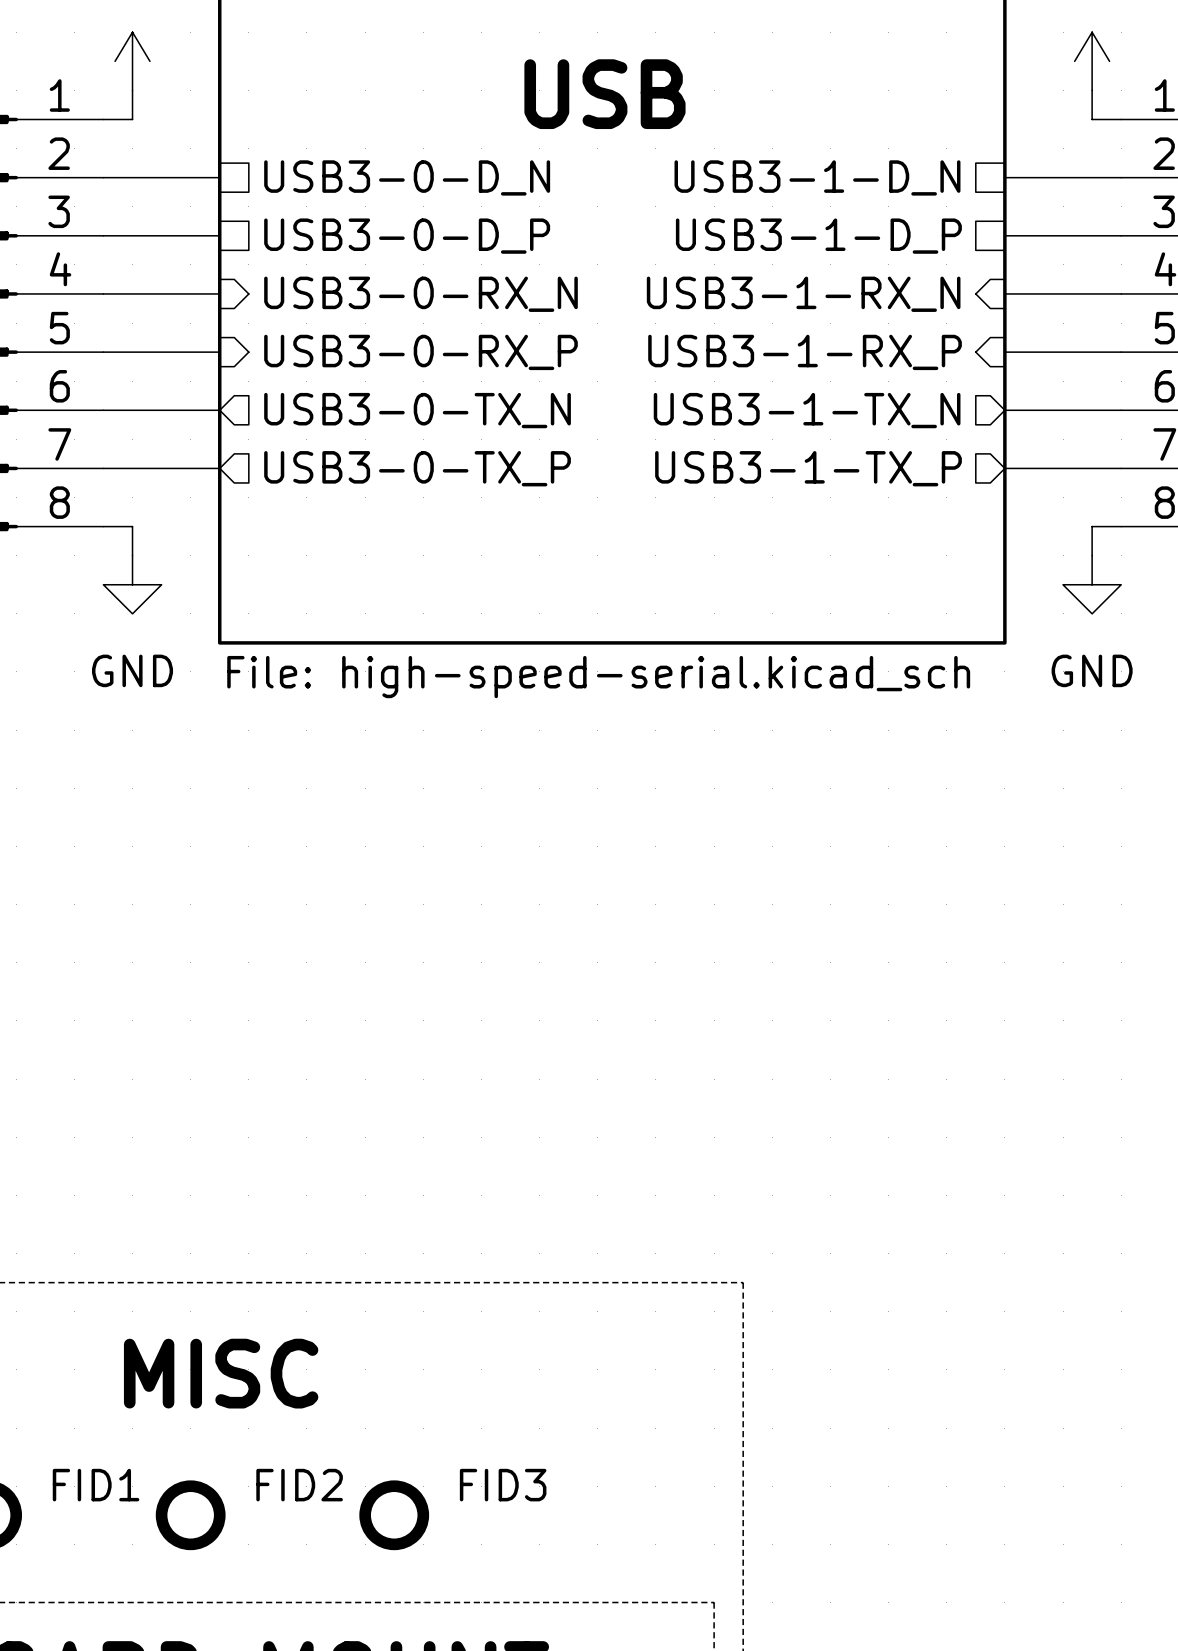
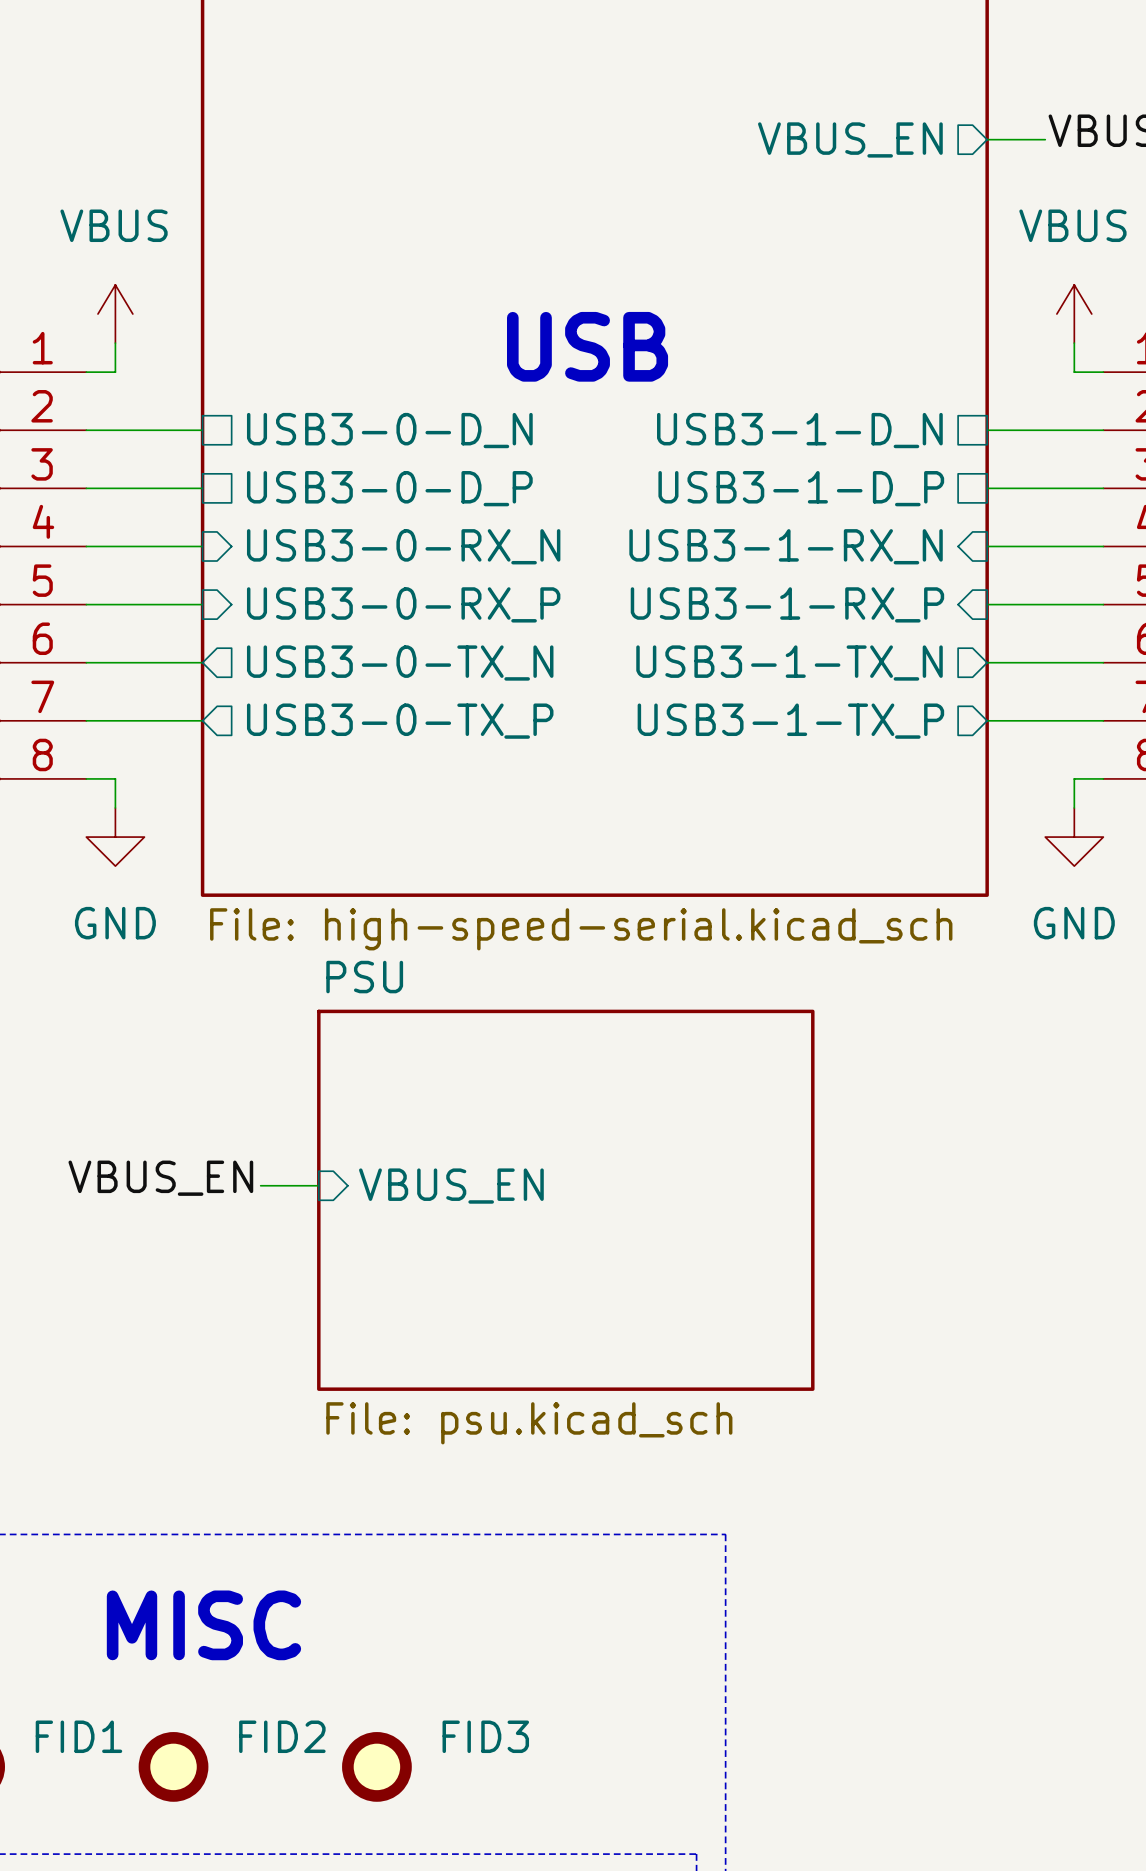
label: none -> VBUS_EN (160, 1178)
wire: none -> (260, 1185) (318, 1185)
sheet pin: none -> VBUS_EN (451, 1186)
sheet PSU: none -> File: psu.kicad_sch (565, 1200)

